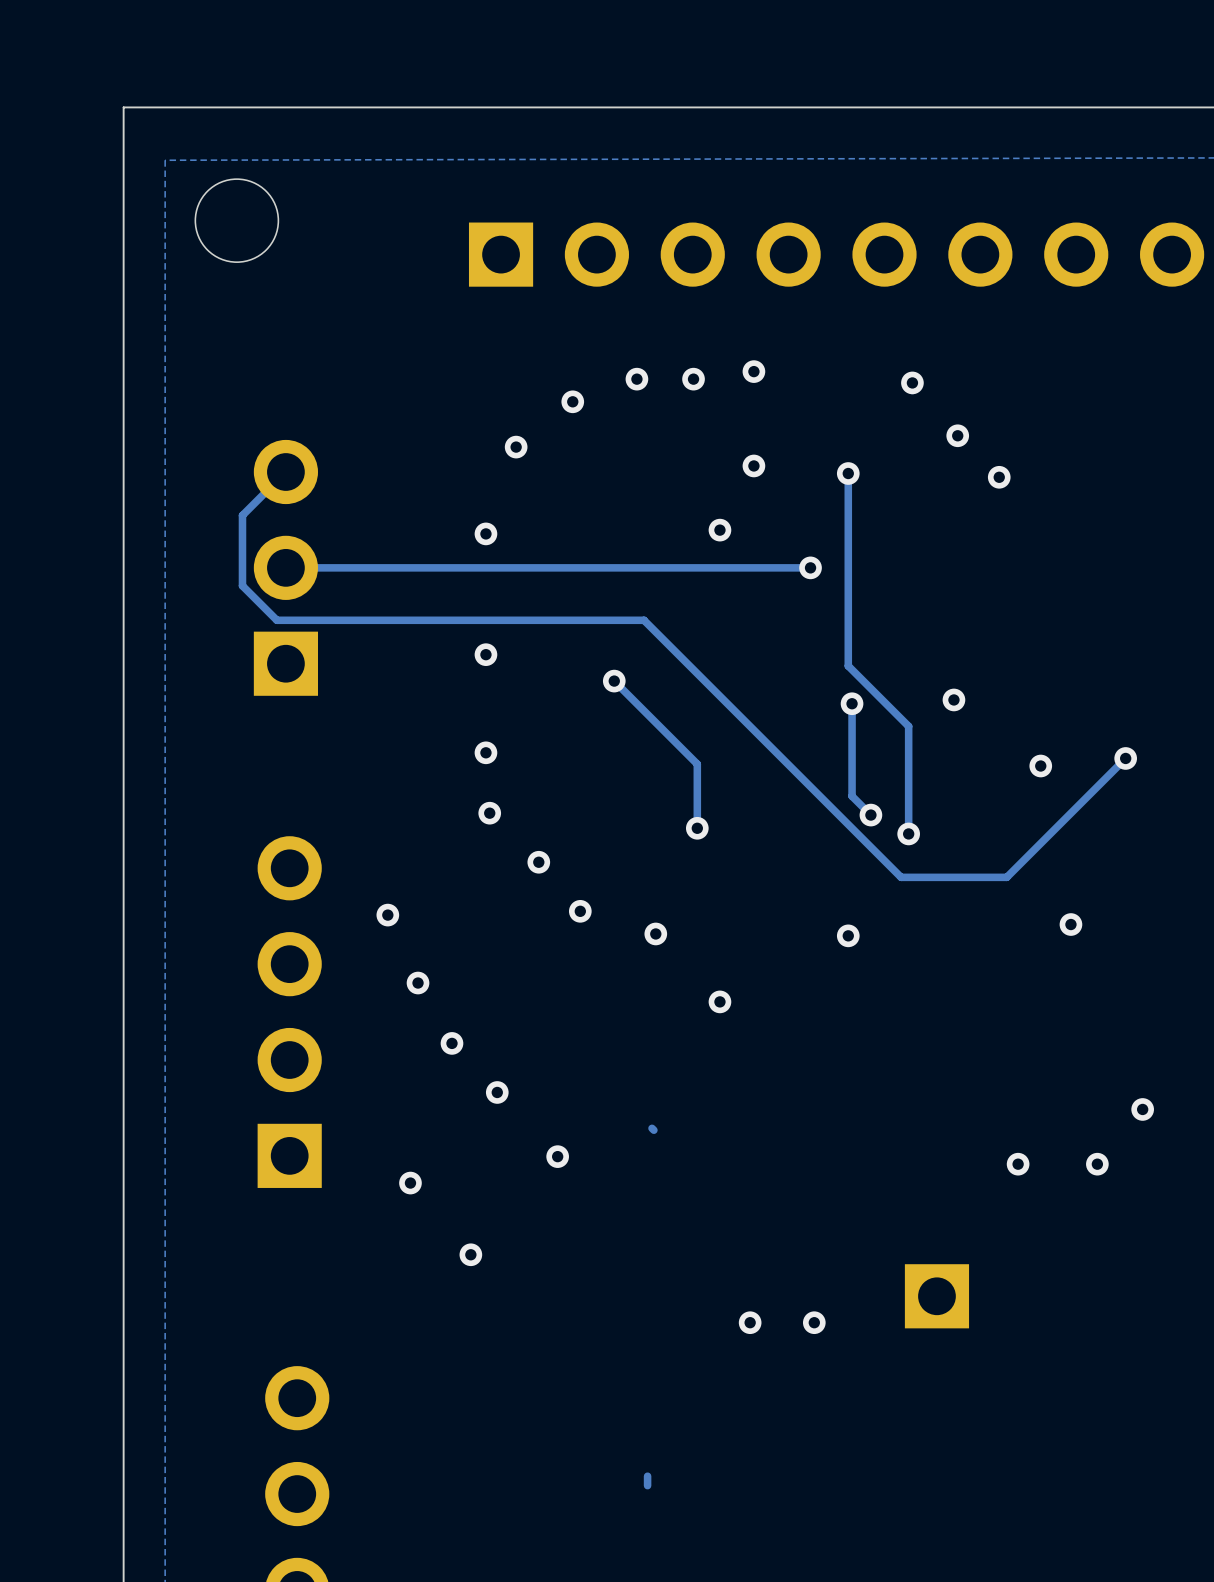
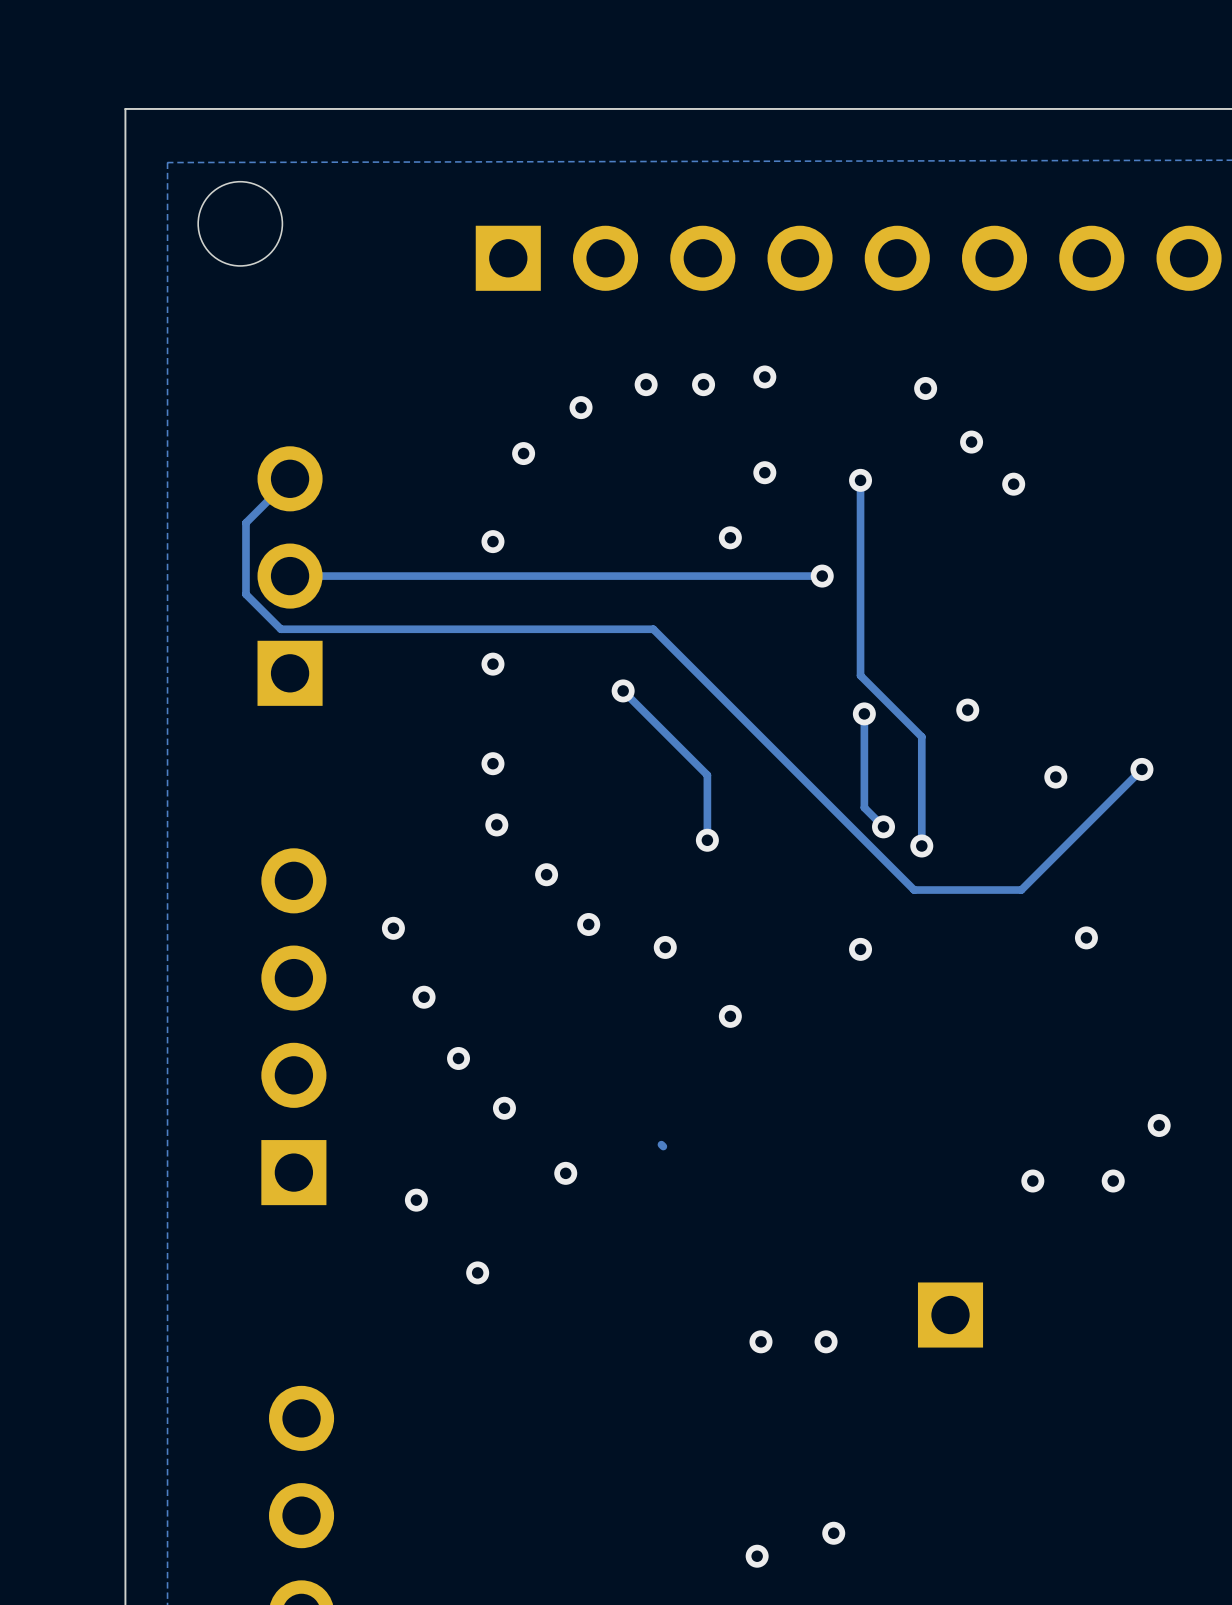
track: (647, 1476) (647, 1485) -> none
via: none -> (833, 1533)
via: none -> (757, 1556)

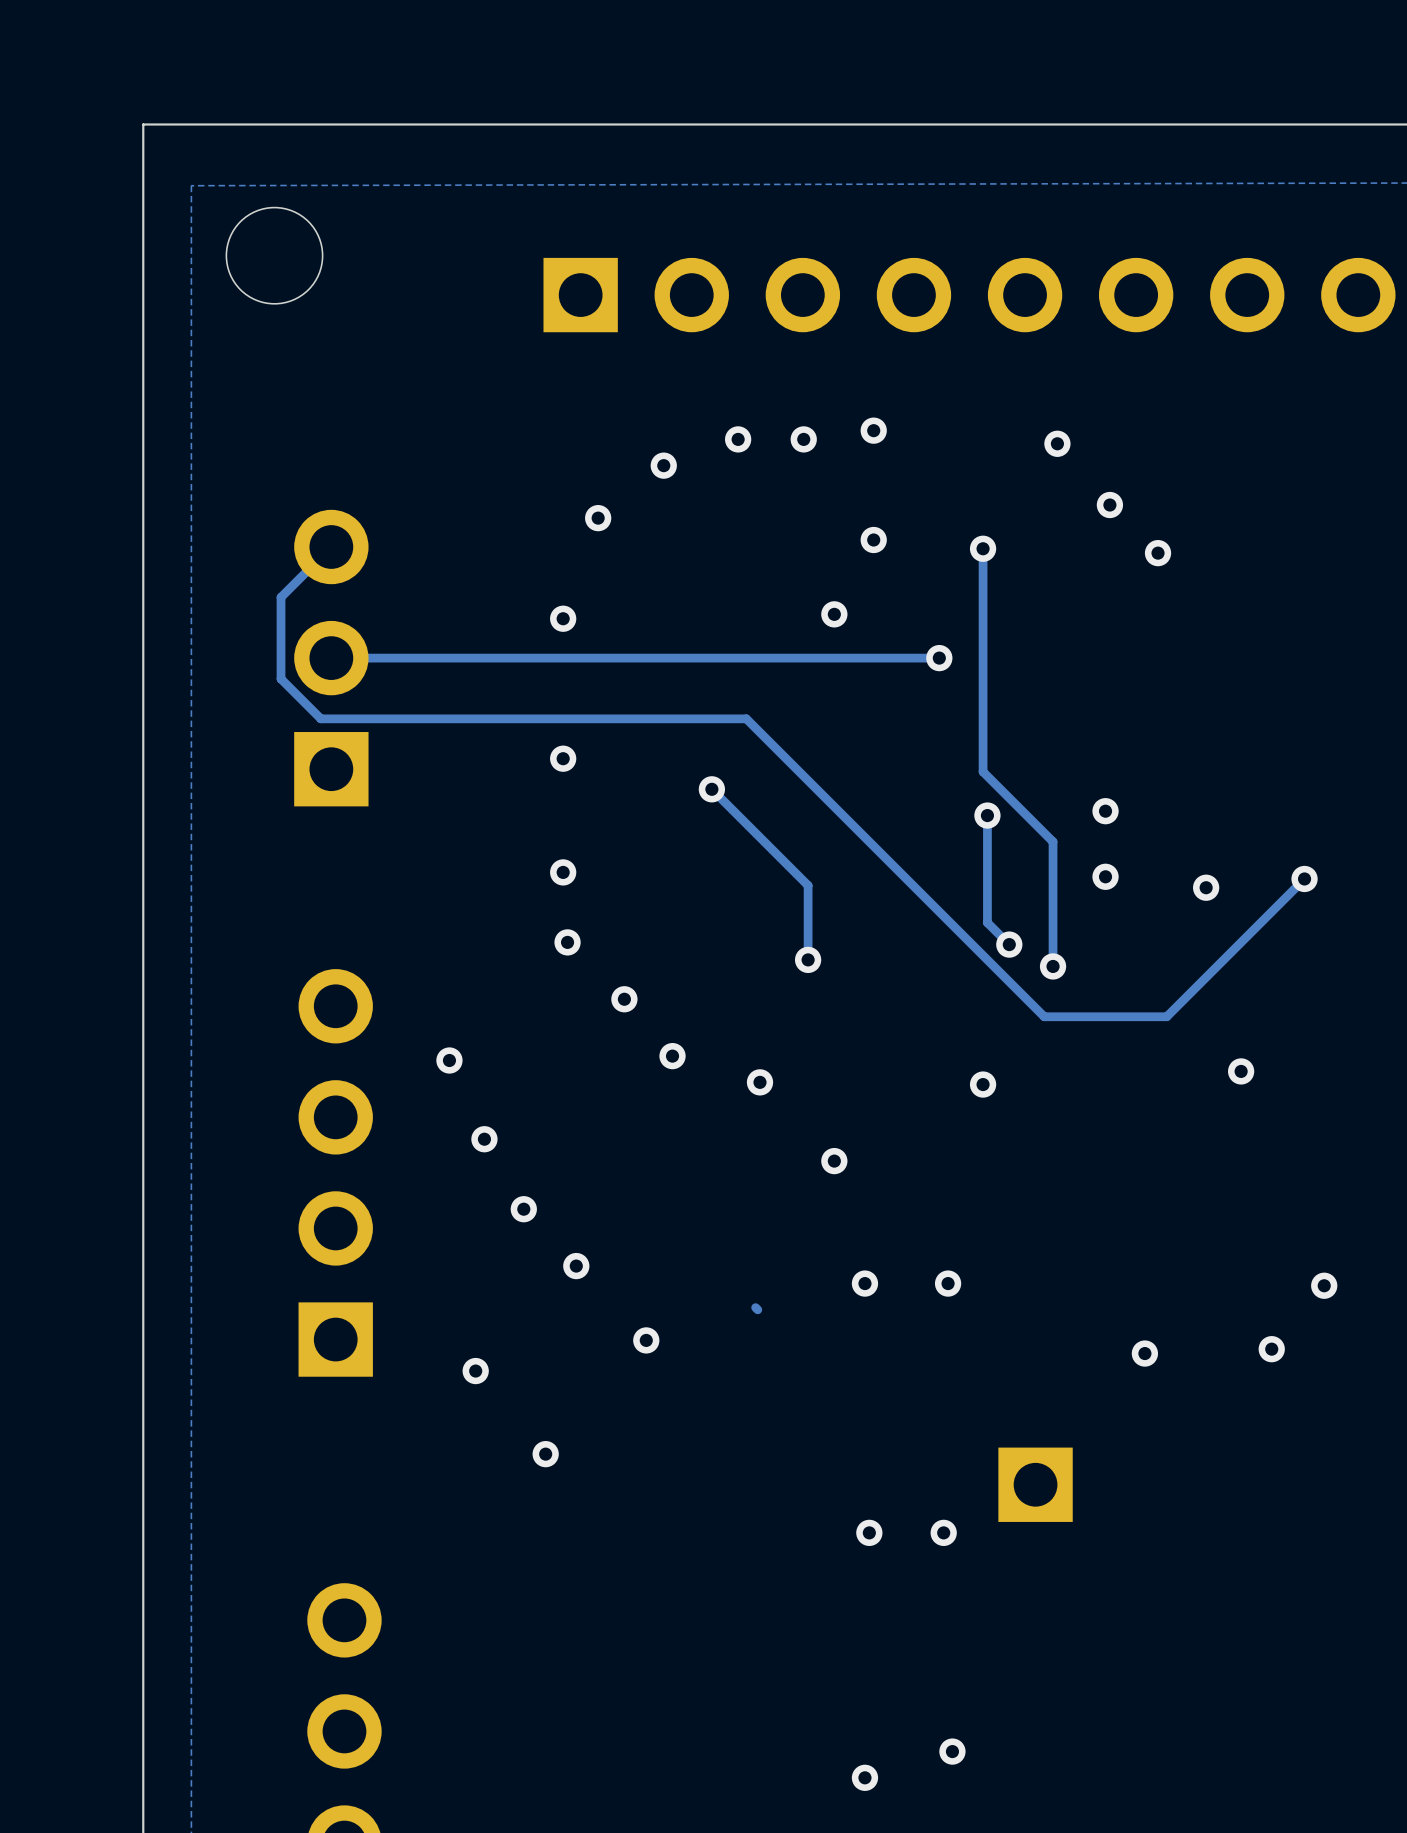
via: none -> (1105, 876)
via: none -> (864, 1283)
via: none -> (948, 1283)
via position: (1032, 1181) -> (1144, 1353)
part position: (950, 1315) -> (1035, 1484)

